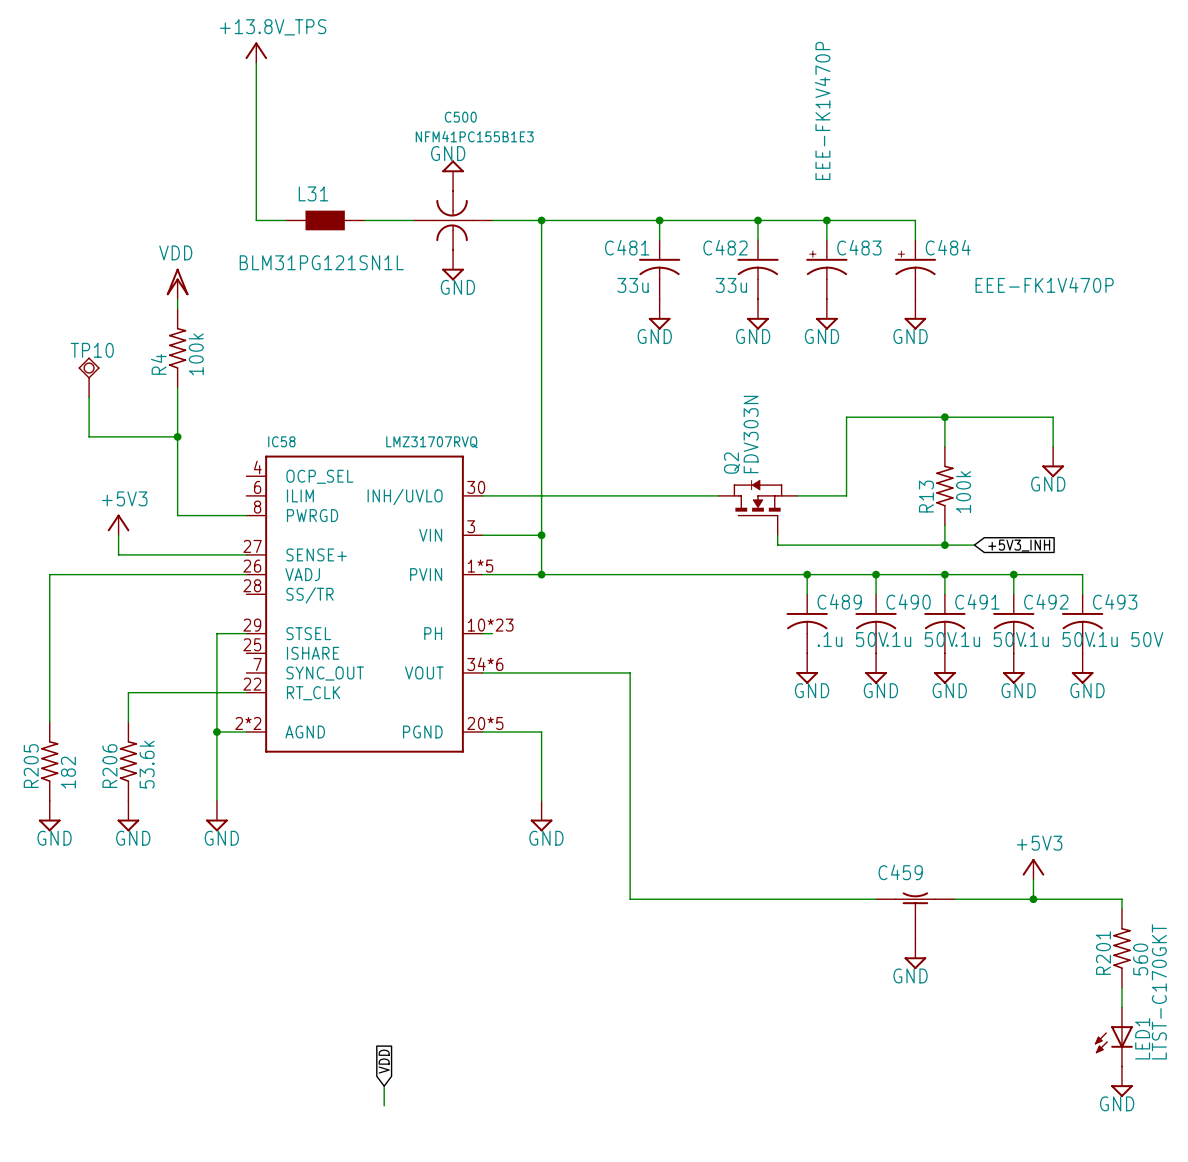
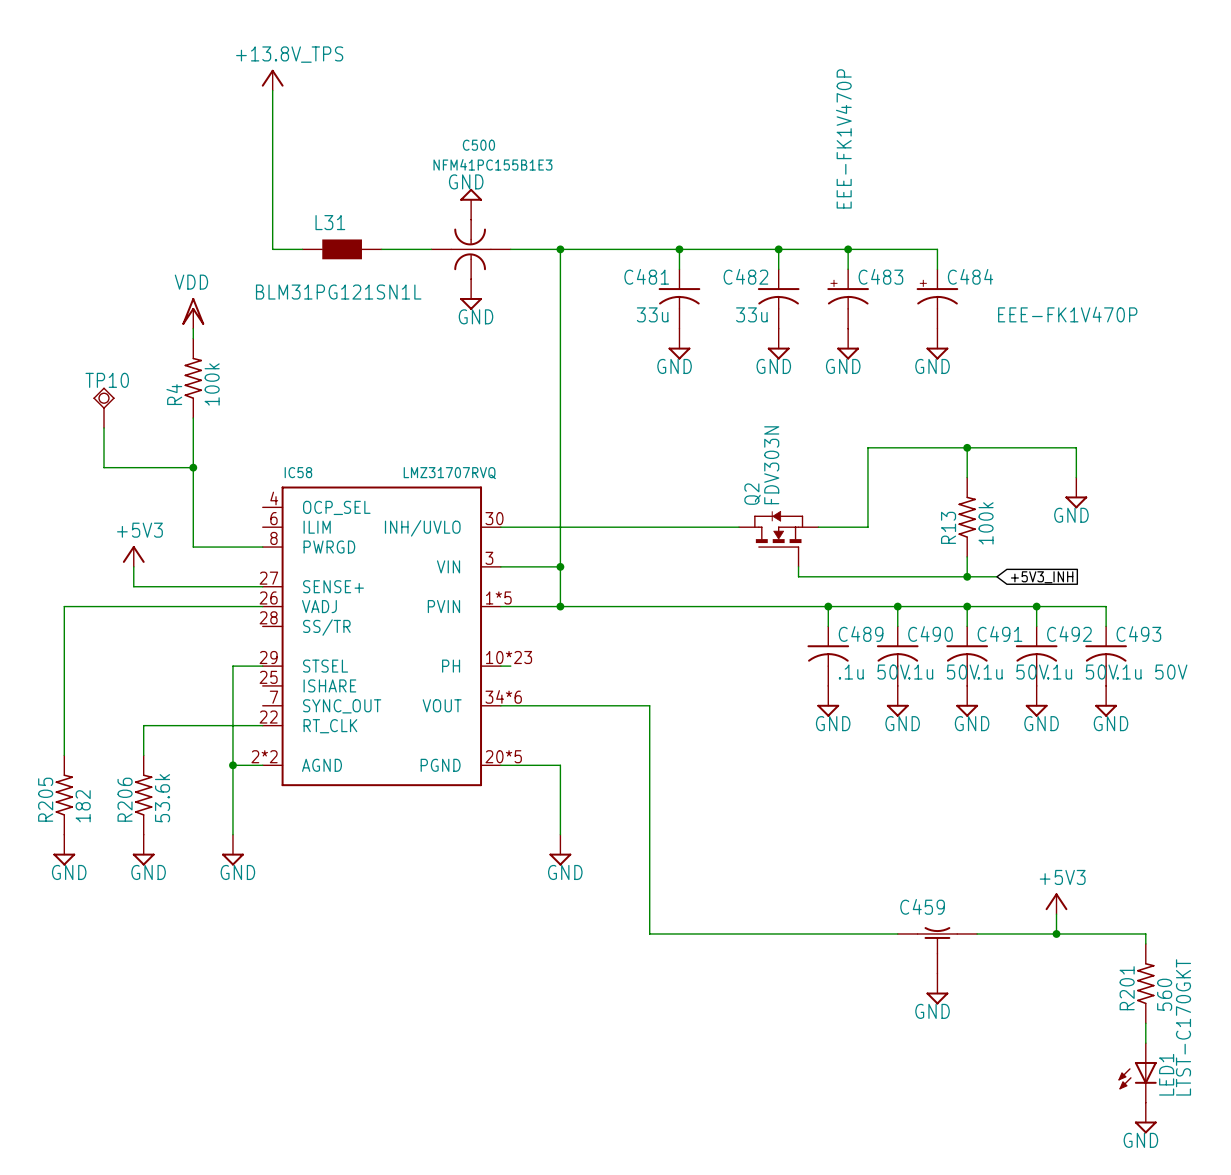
global label: VDD (384, 1061) -> none
wire: (384, 1086) (384, 1105) -> none

